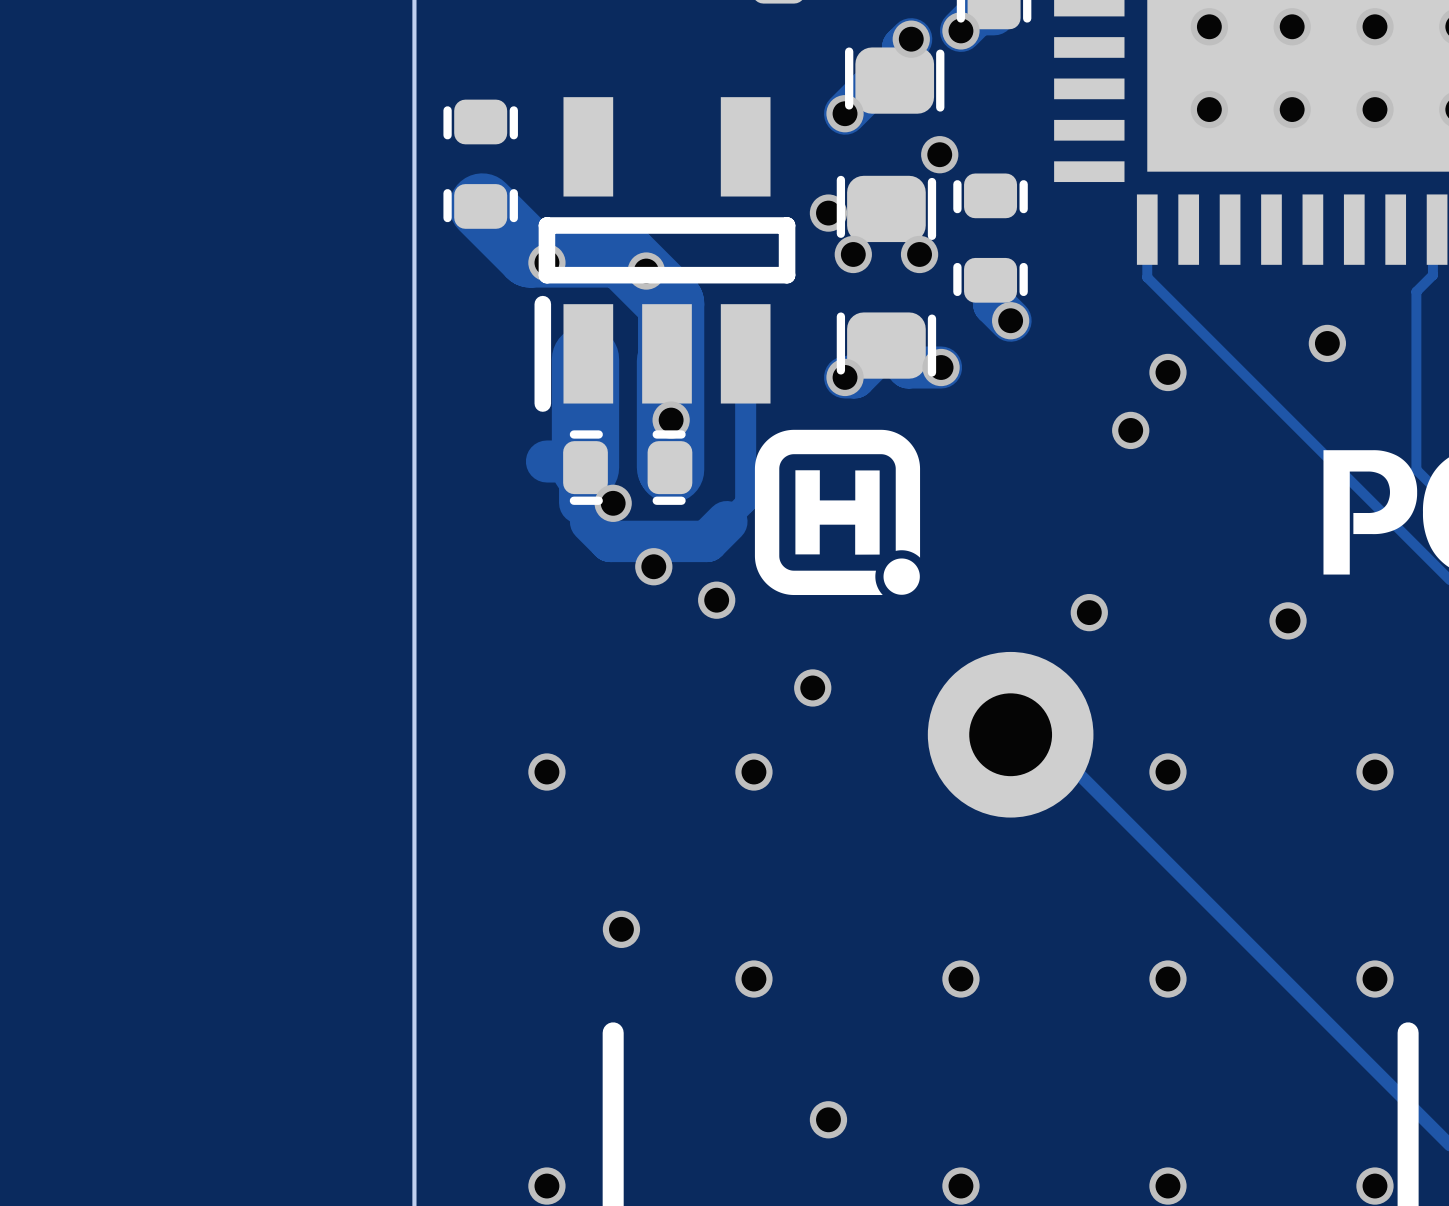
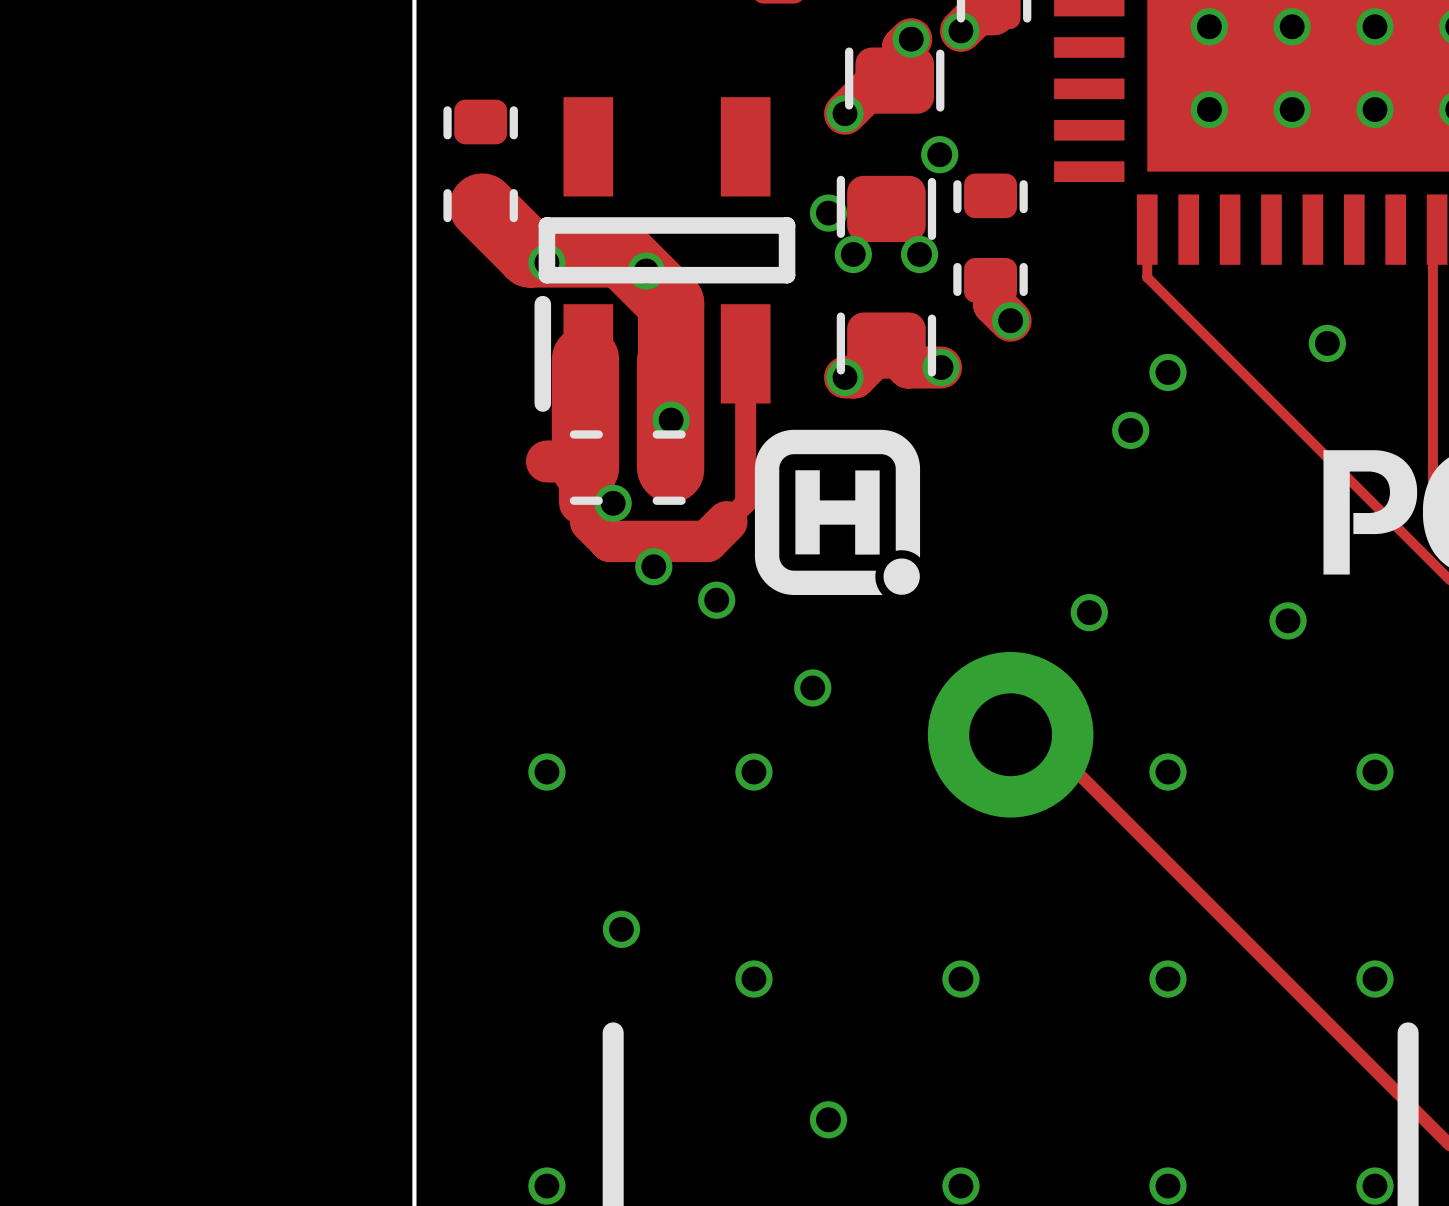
track: (1432, 275) (1416, 291) (1416, 469) (1432, 486) -> (1432, 275) (1432, 486)

